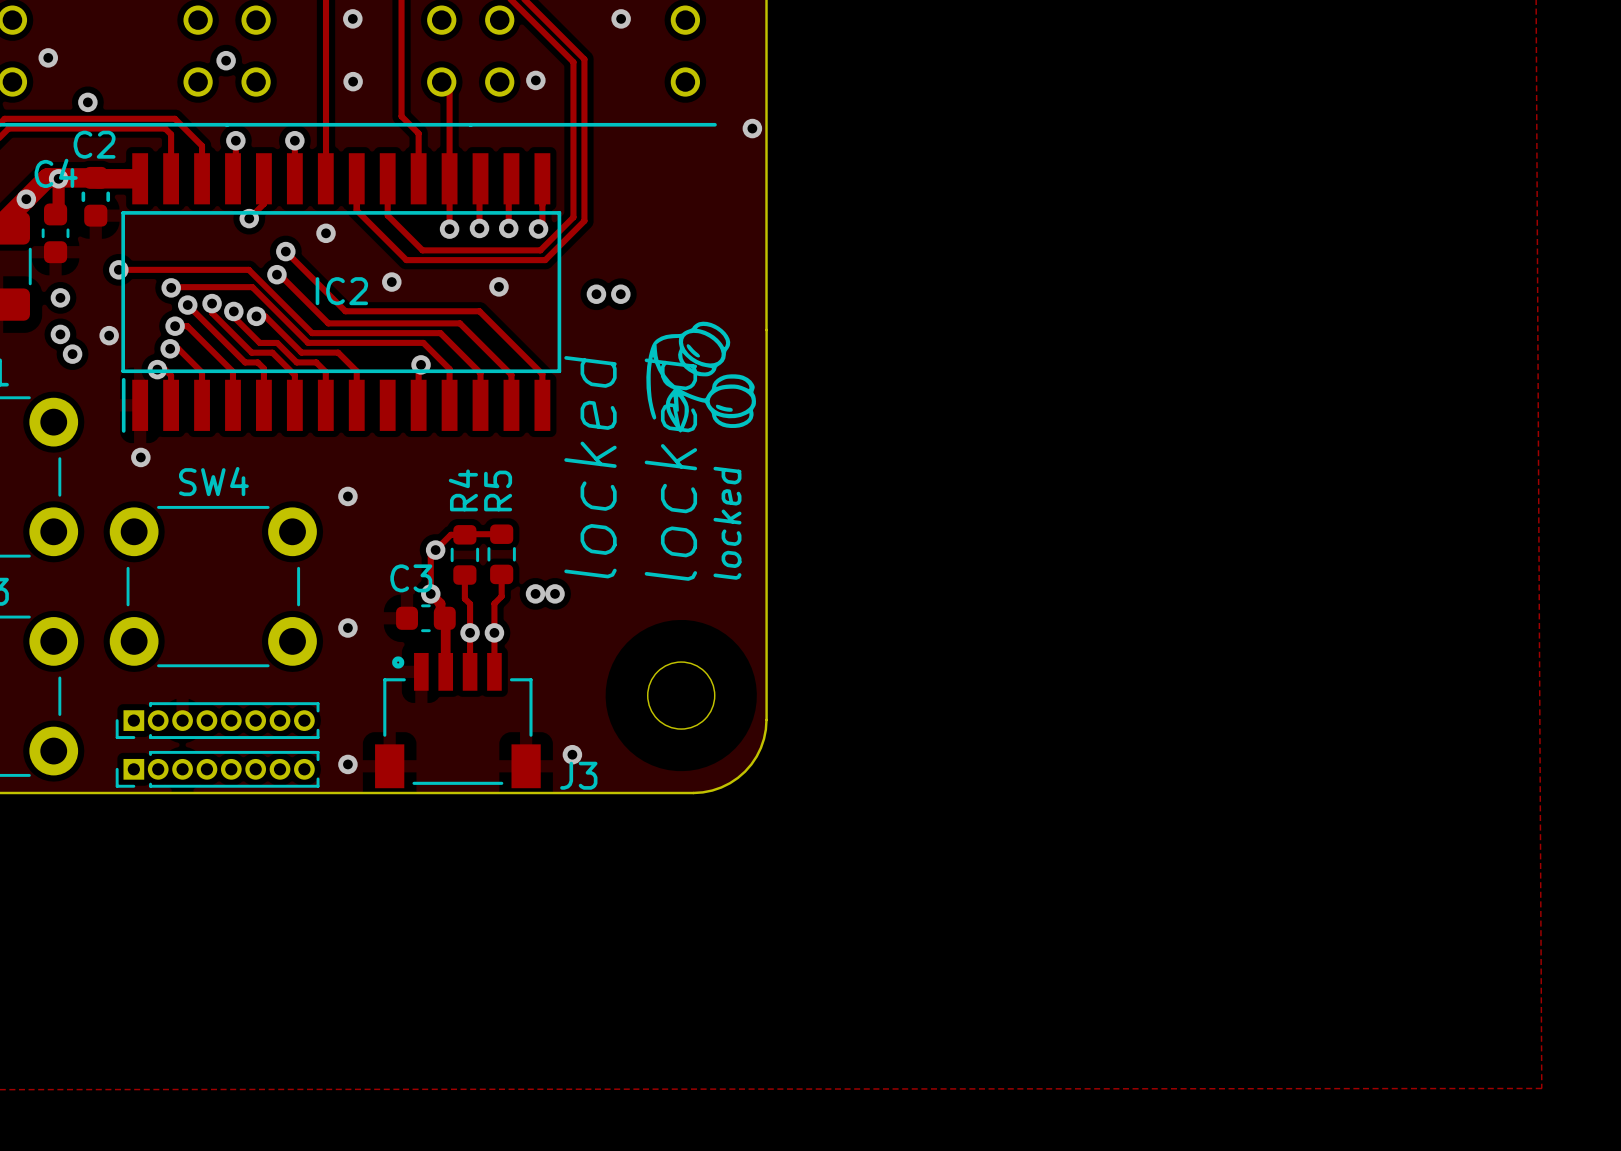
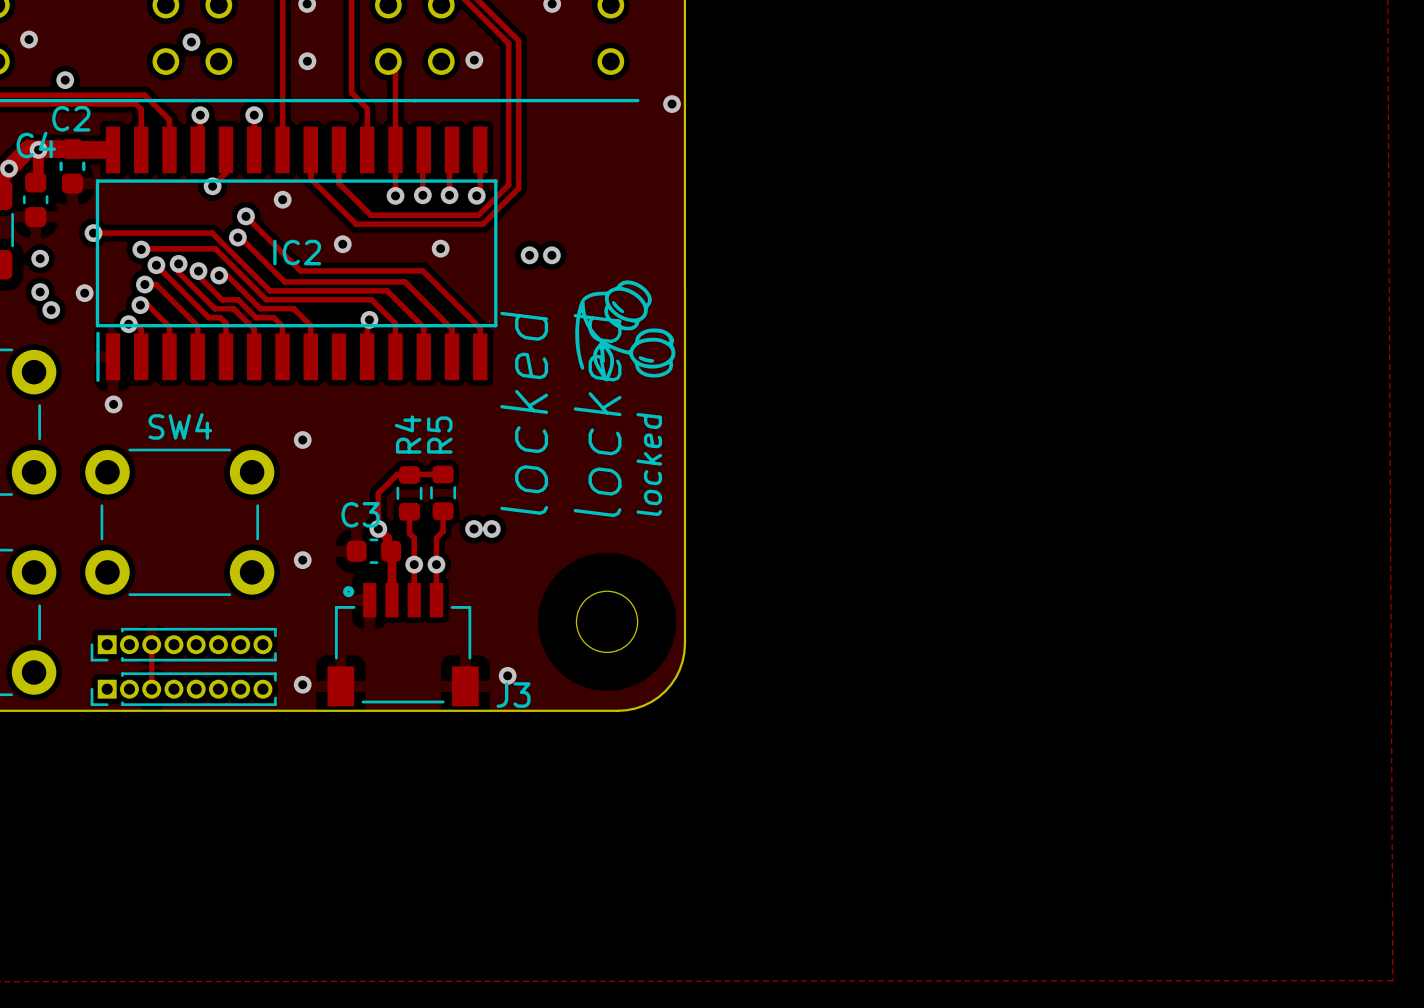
via: (435, 550) -> none
track: none -> (151, 644) (151, 689)

